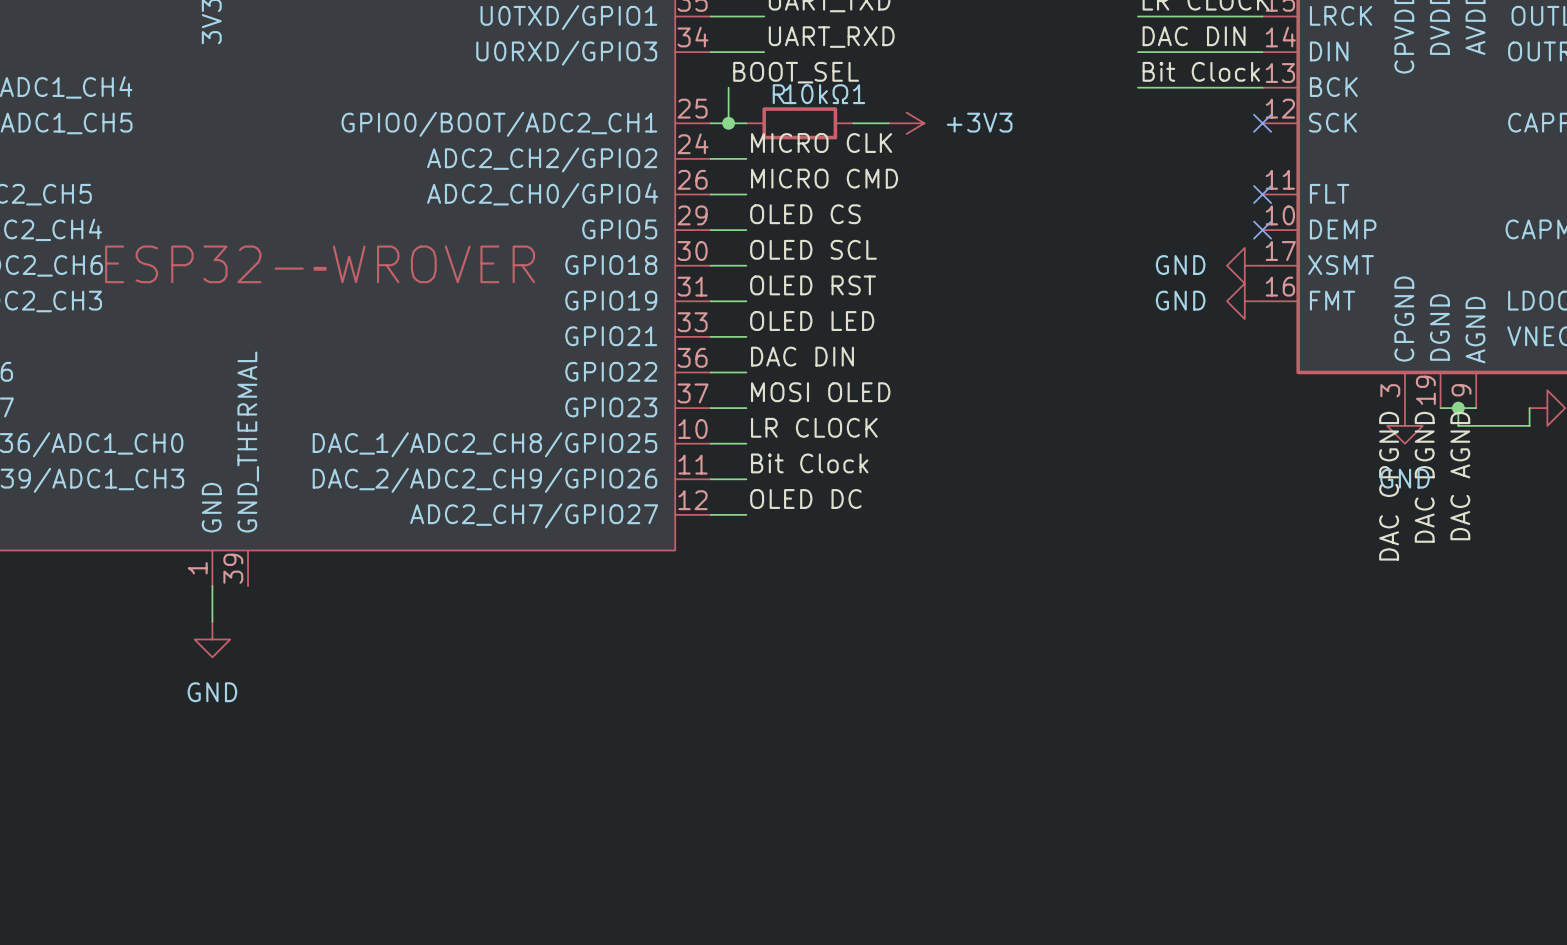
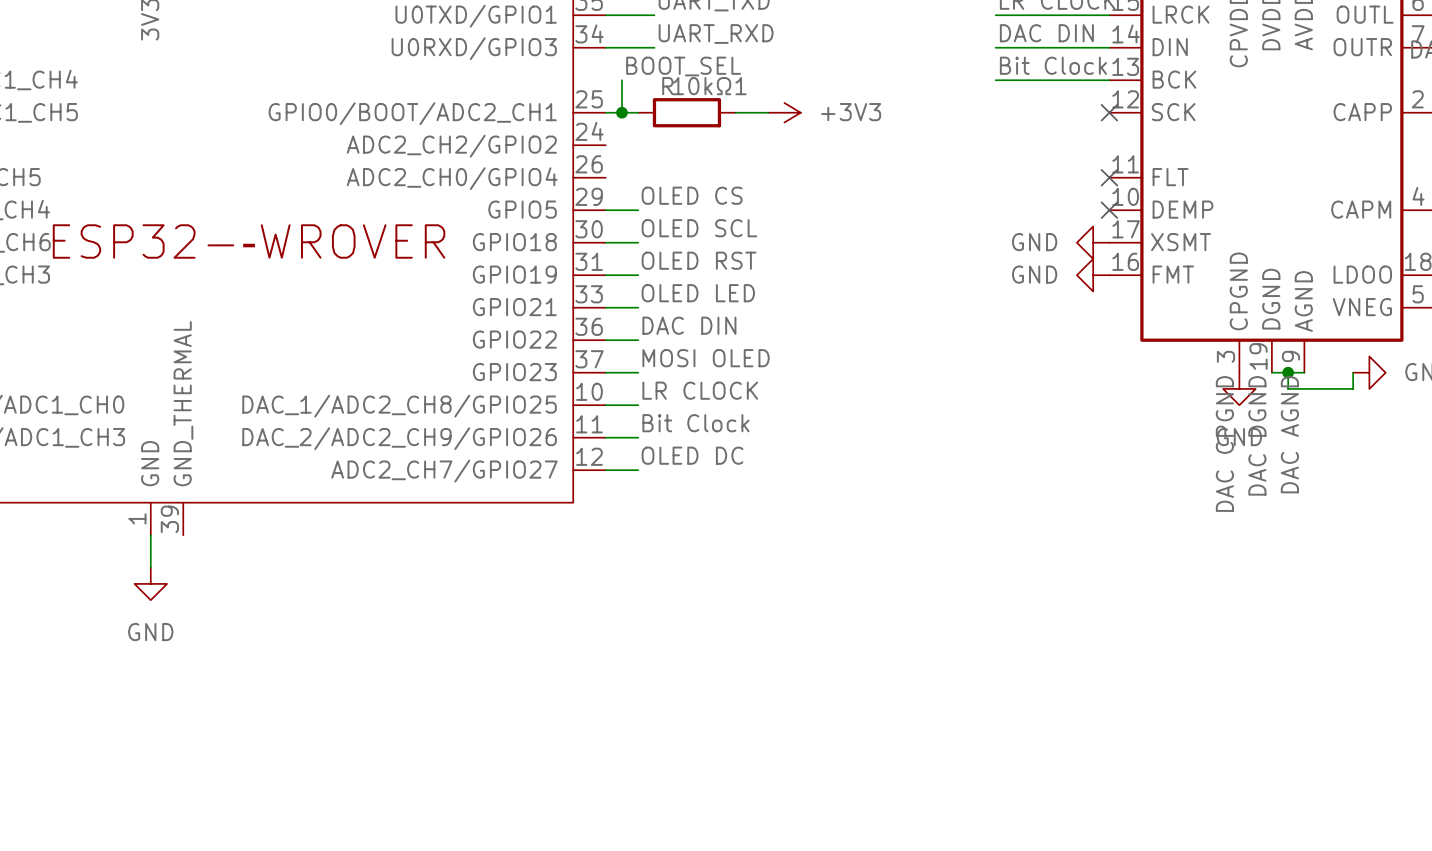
label: MICRO CLK (821, 143) -> none
wire: (710, 158) (746, 158) -> none
label: MICRO CMD (824, 178) -> none
wire: (710, 194) (746, 194) -> none

